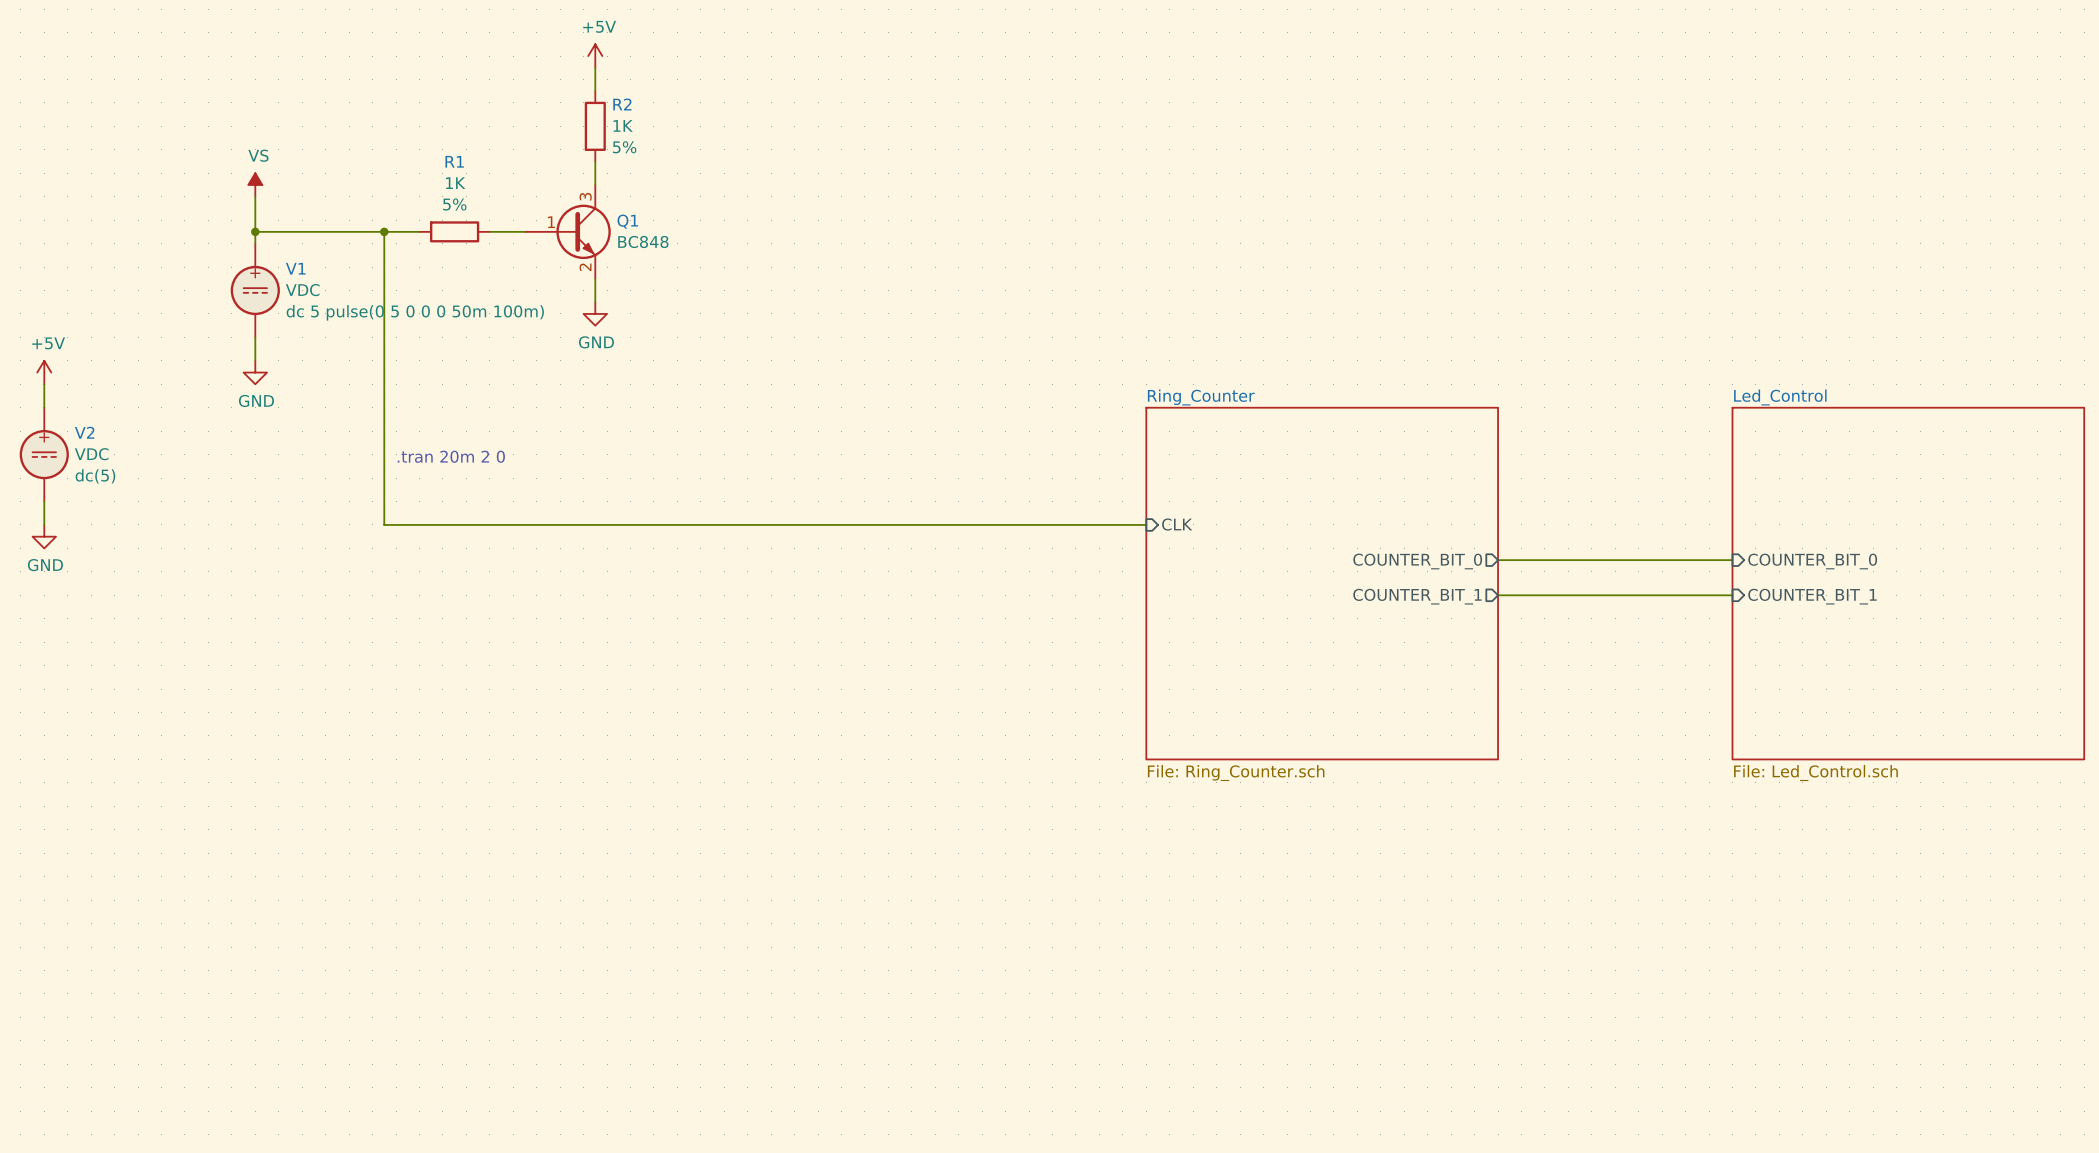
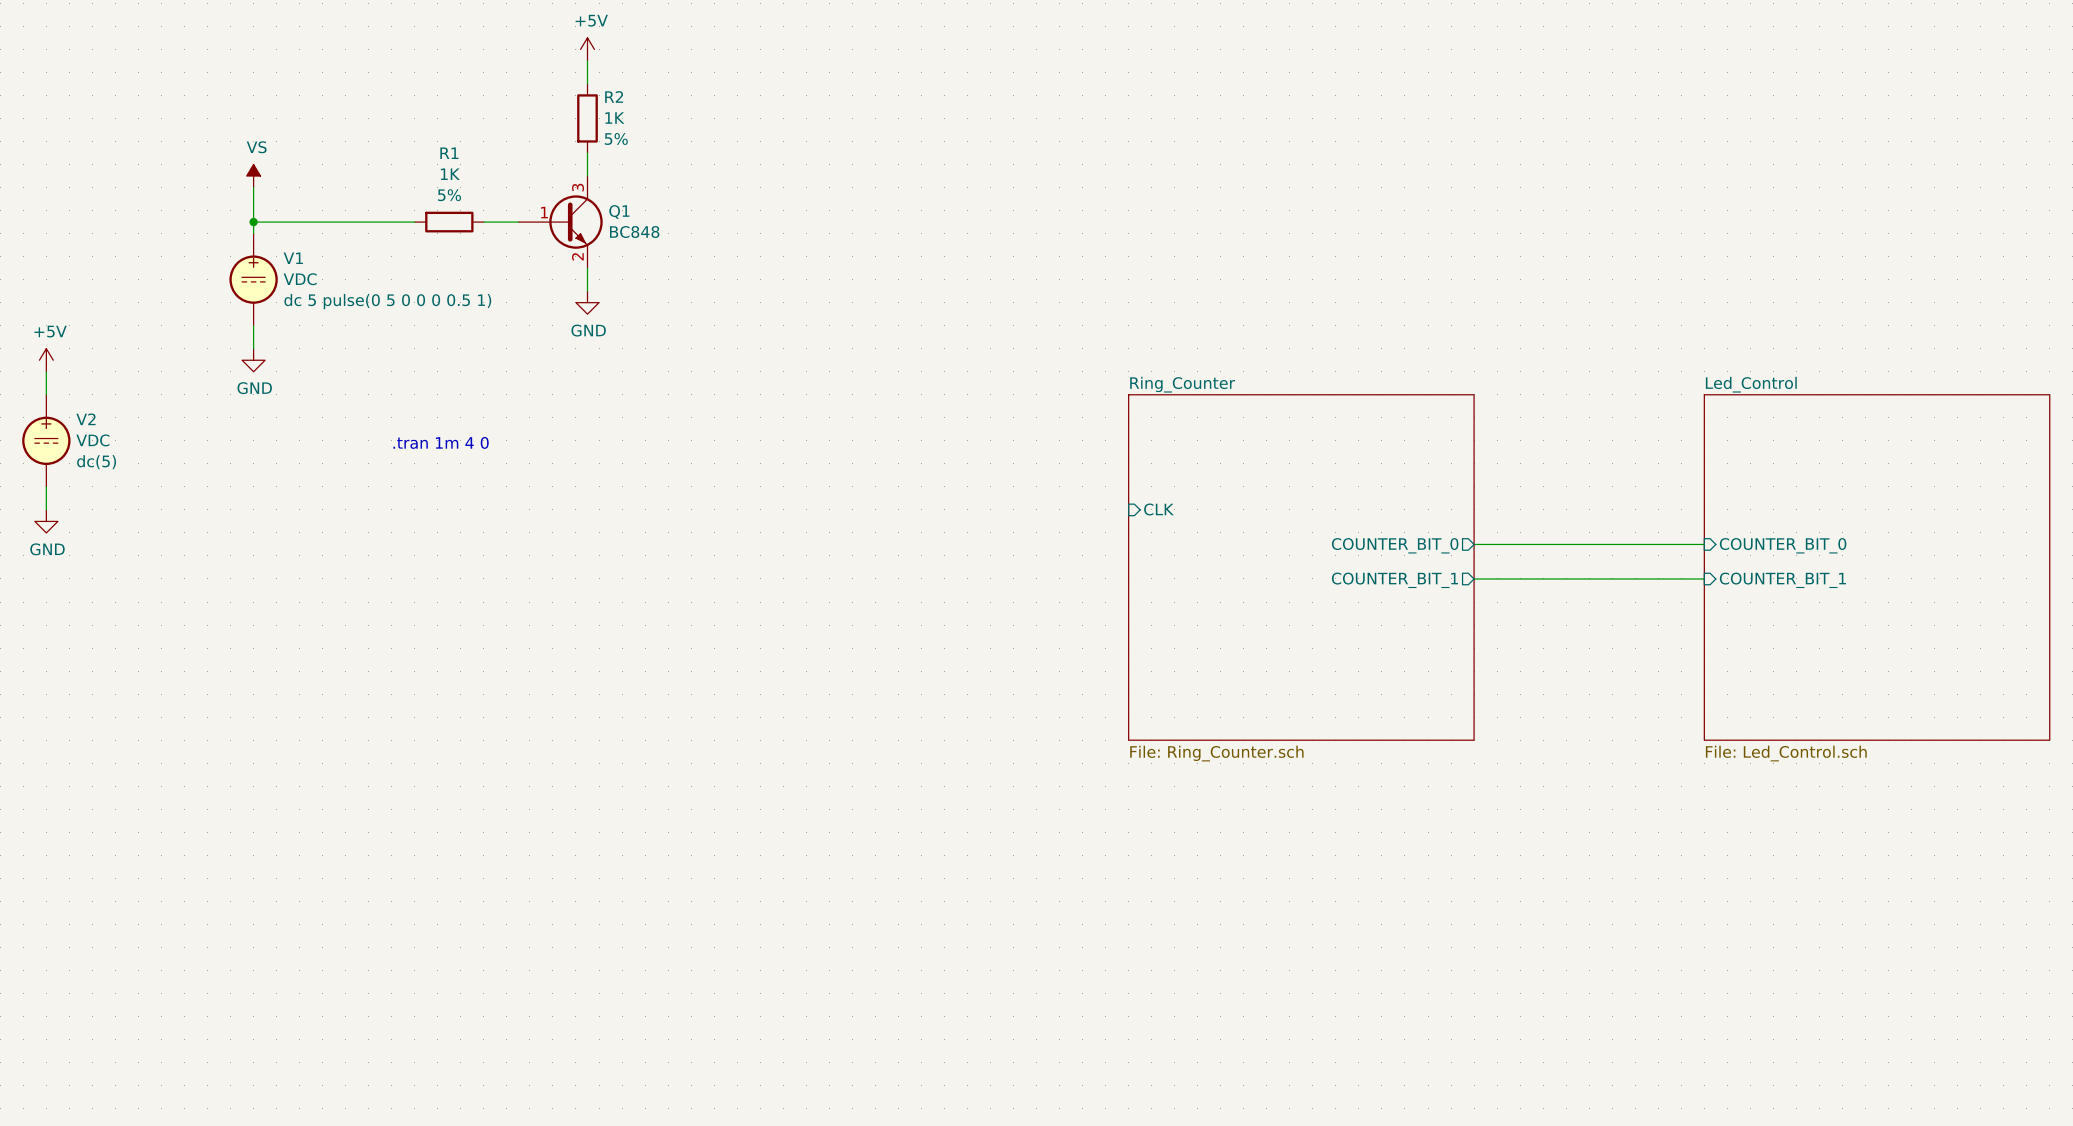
wire: (384, 231) (384, 524) (1146, 524) -> none
junction: (384, 231) -> none
V1 text: dc 5 pulse(0 5 0 0 0 50m 100m) (415, 312) -> dc 5 pulse(0 5 0 0 0 0.5 1) (387, 301)
text: .tran 20m 2 0 (451, 456) -> .tran 1m 4 0 (441, 442)

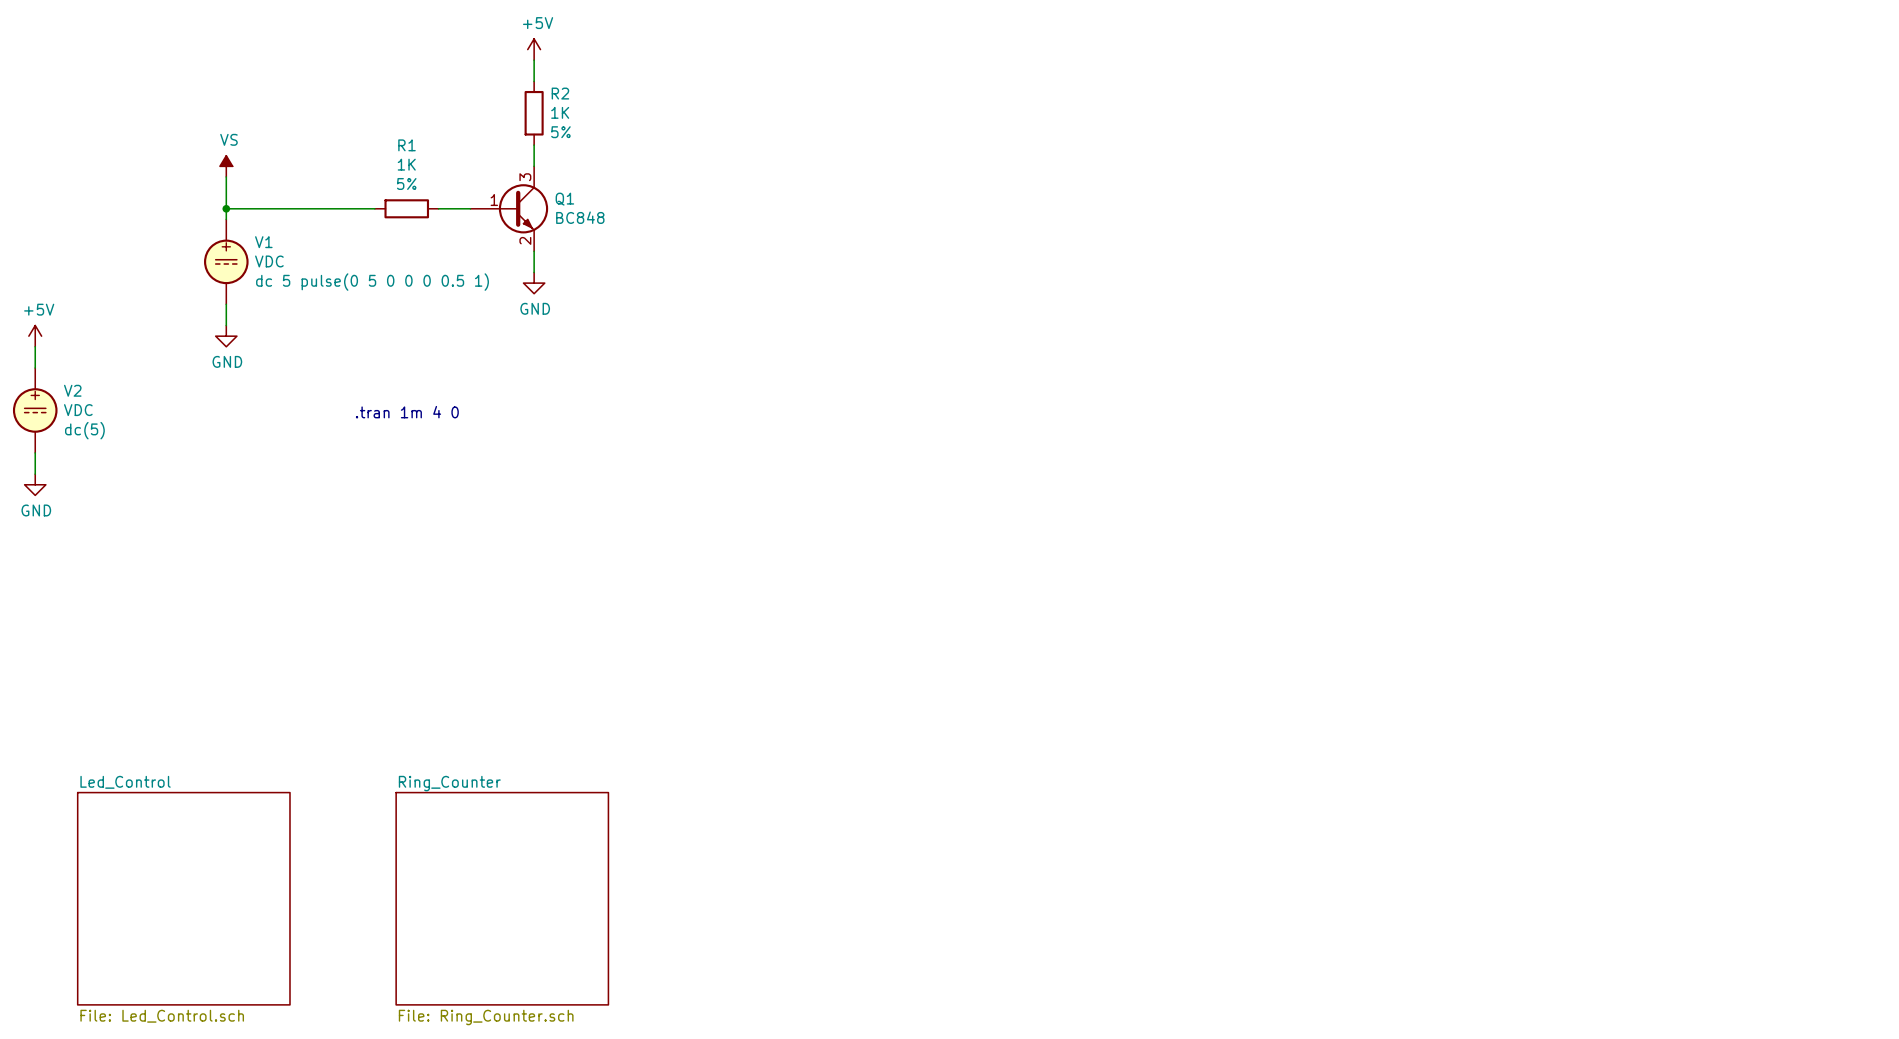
sheet pin: CLK (1158, 509) -> none
wire: (1474, 544) (1704, 544) -> none
sheet pin: COUNTER_BIT_0 (1395, 545) -> none
sheet pin: COUNTER_BIT_0 (1783, 545) -> none
sheet Ring_Counter: File: Ring_Counter.sch (1301, 567) -> none
sheet Led_Control: File: Led_Control.sch (1877, 567) -> none
wire: (1474, 578) (1704, 578) -> none
sheet pin: COUNTER_BIT_1 (1394, 580) -> none
sheet pin: COUNTER_BIT_1 (1782, 580) -> none
sheet Led_Control: none -> File: Led_Control.sch (183, 898)
sheet Ring_Counter: none -> File: Ring_Counter.sch (502, 898)

